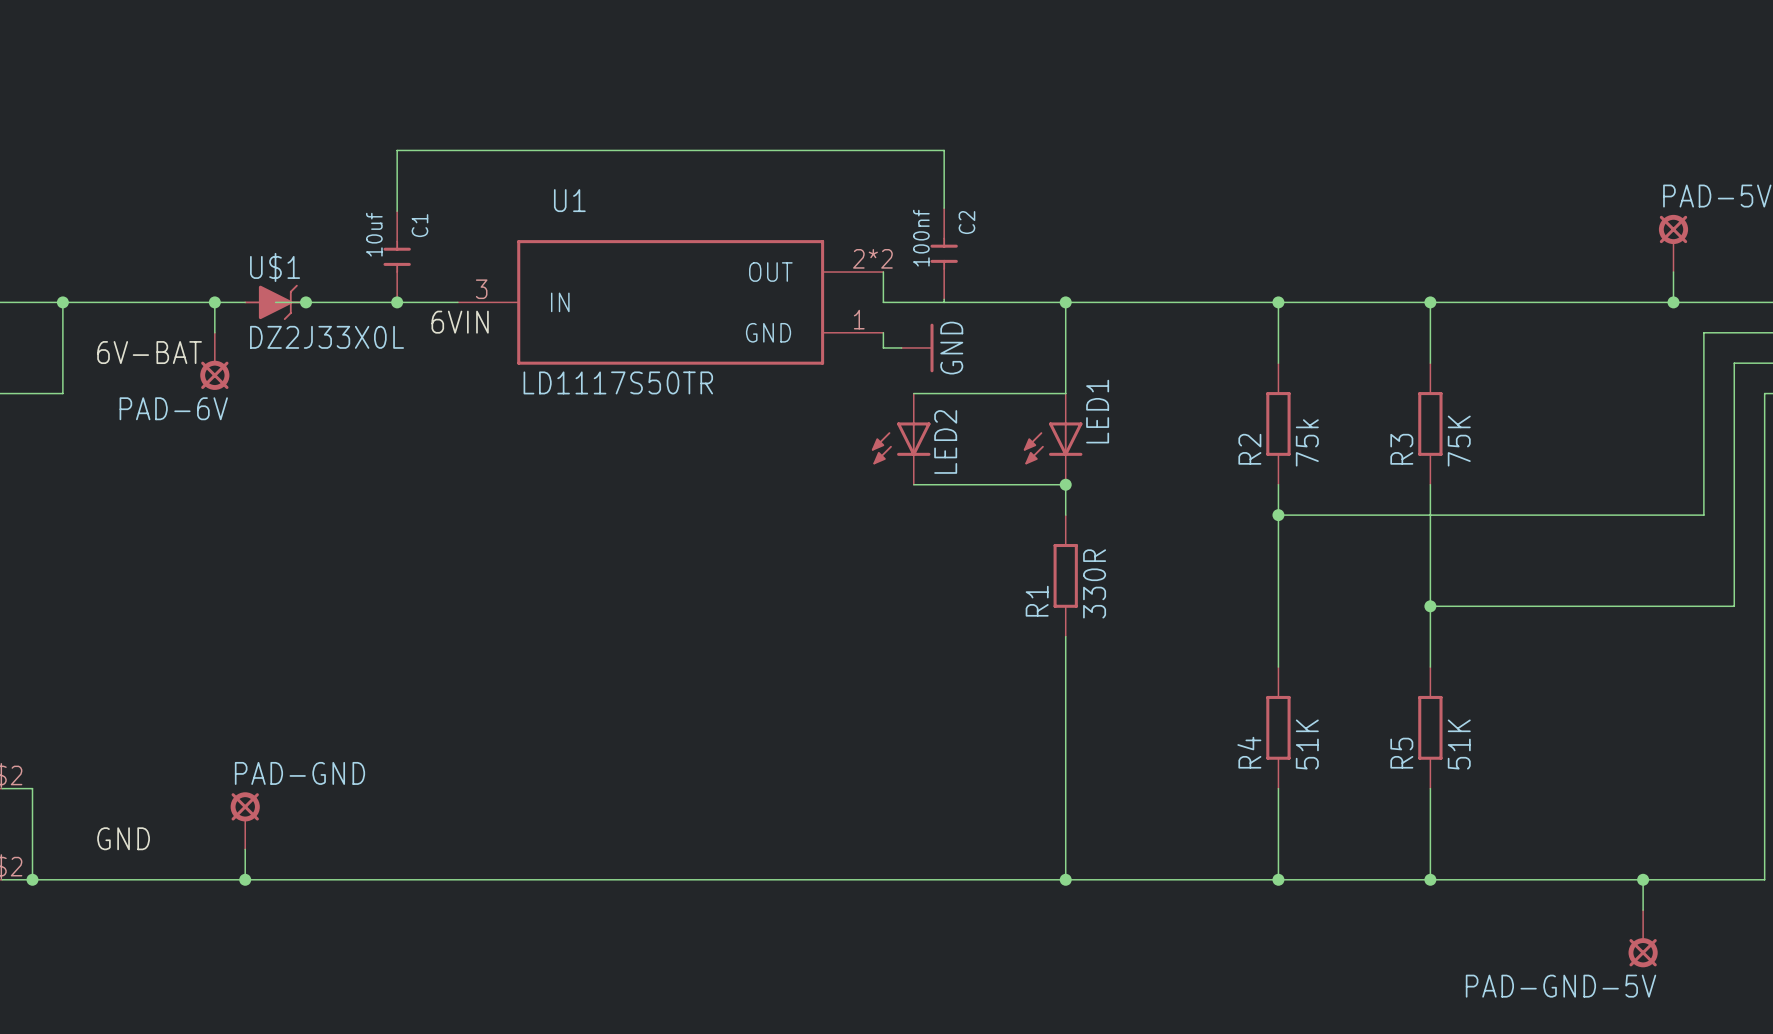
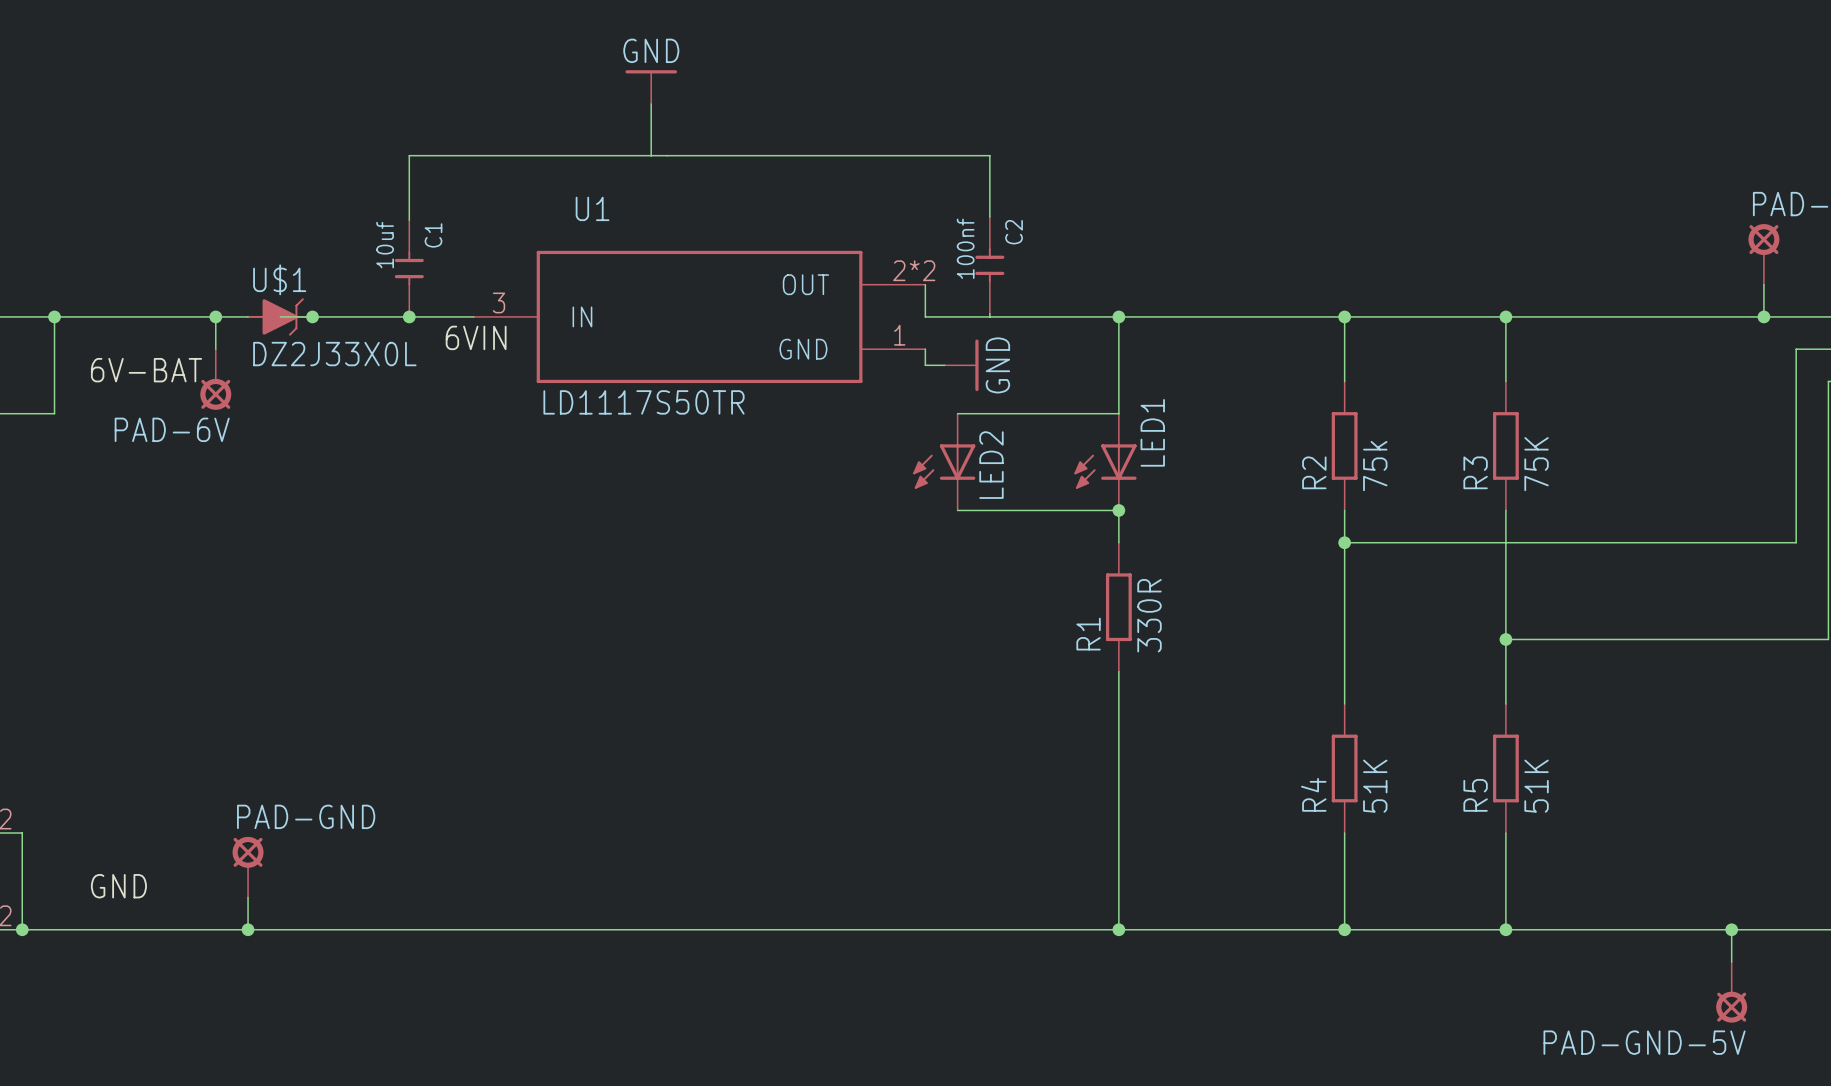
power symbol: none -> GND (651, 87)
wire: none -> (651, 104) (651, 155)

